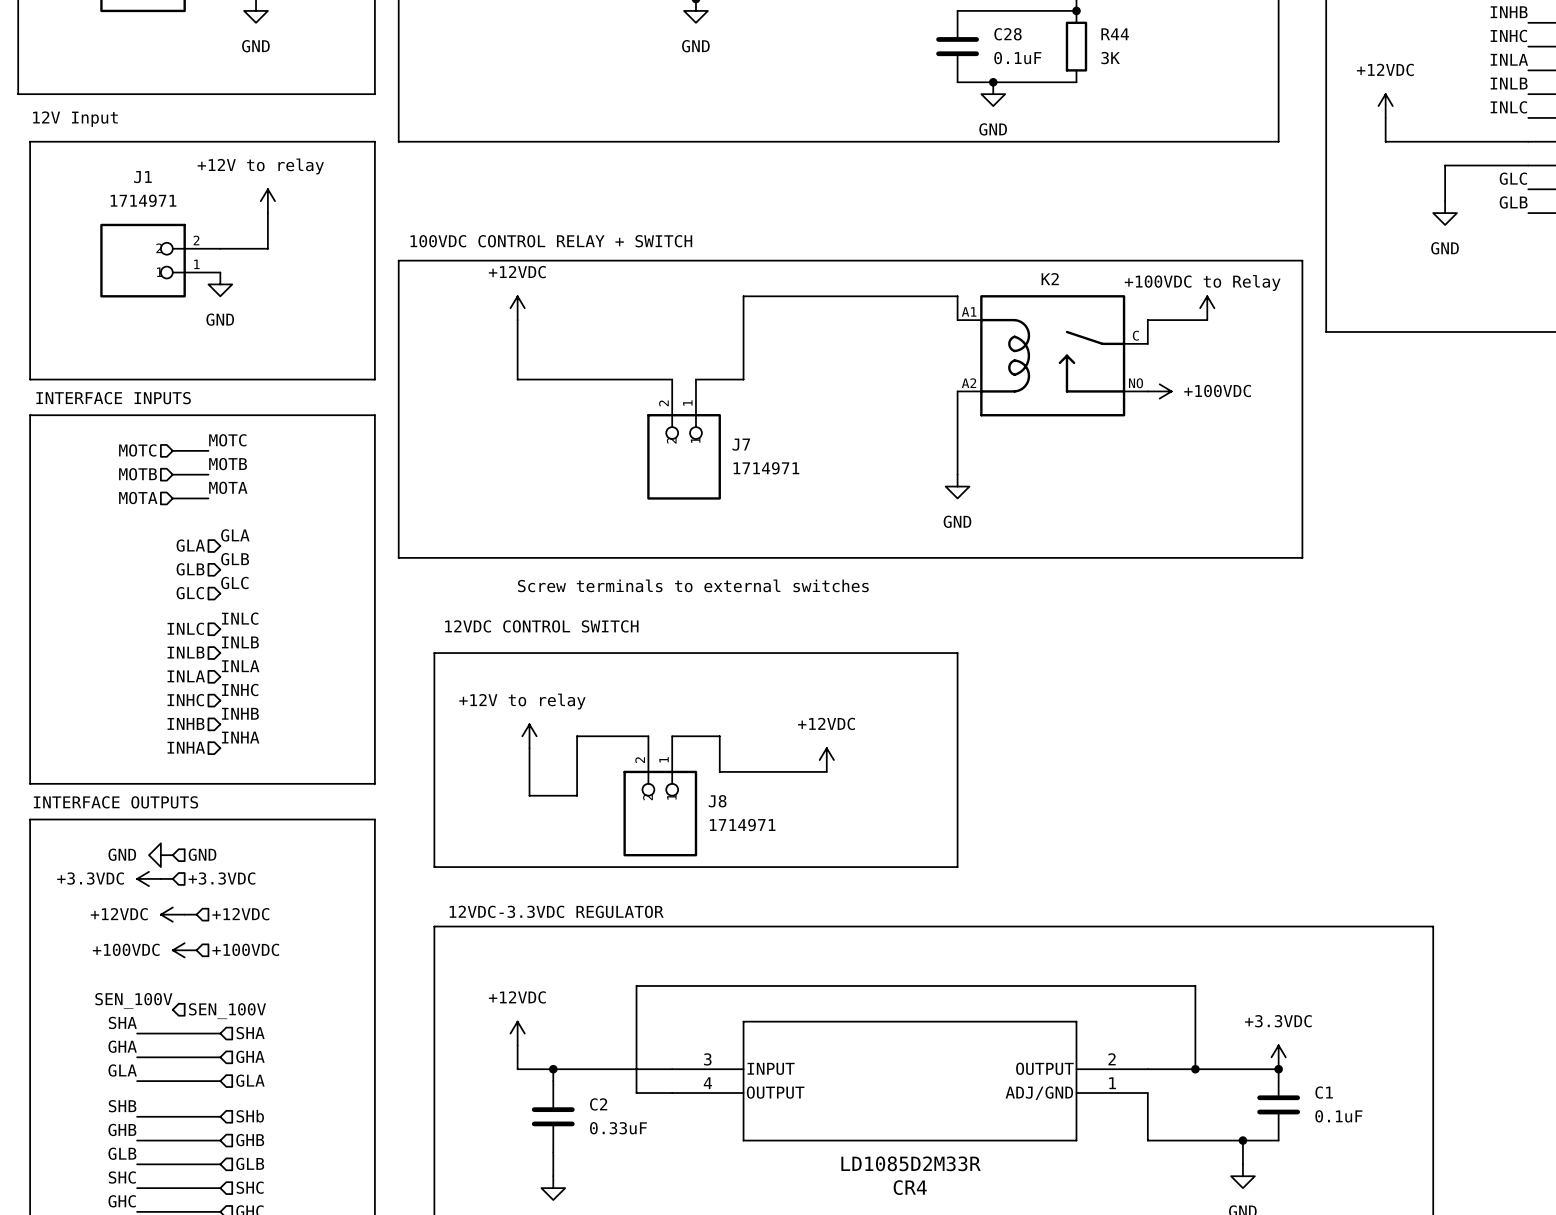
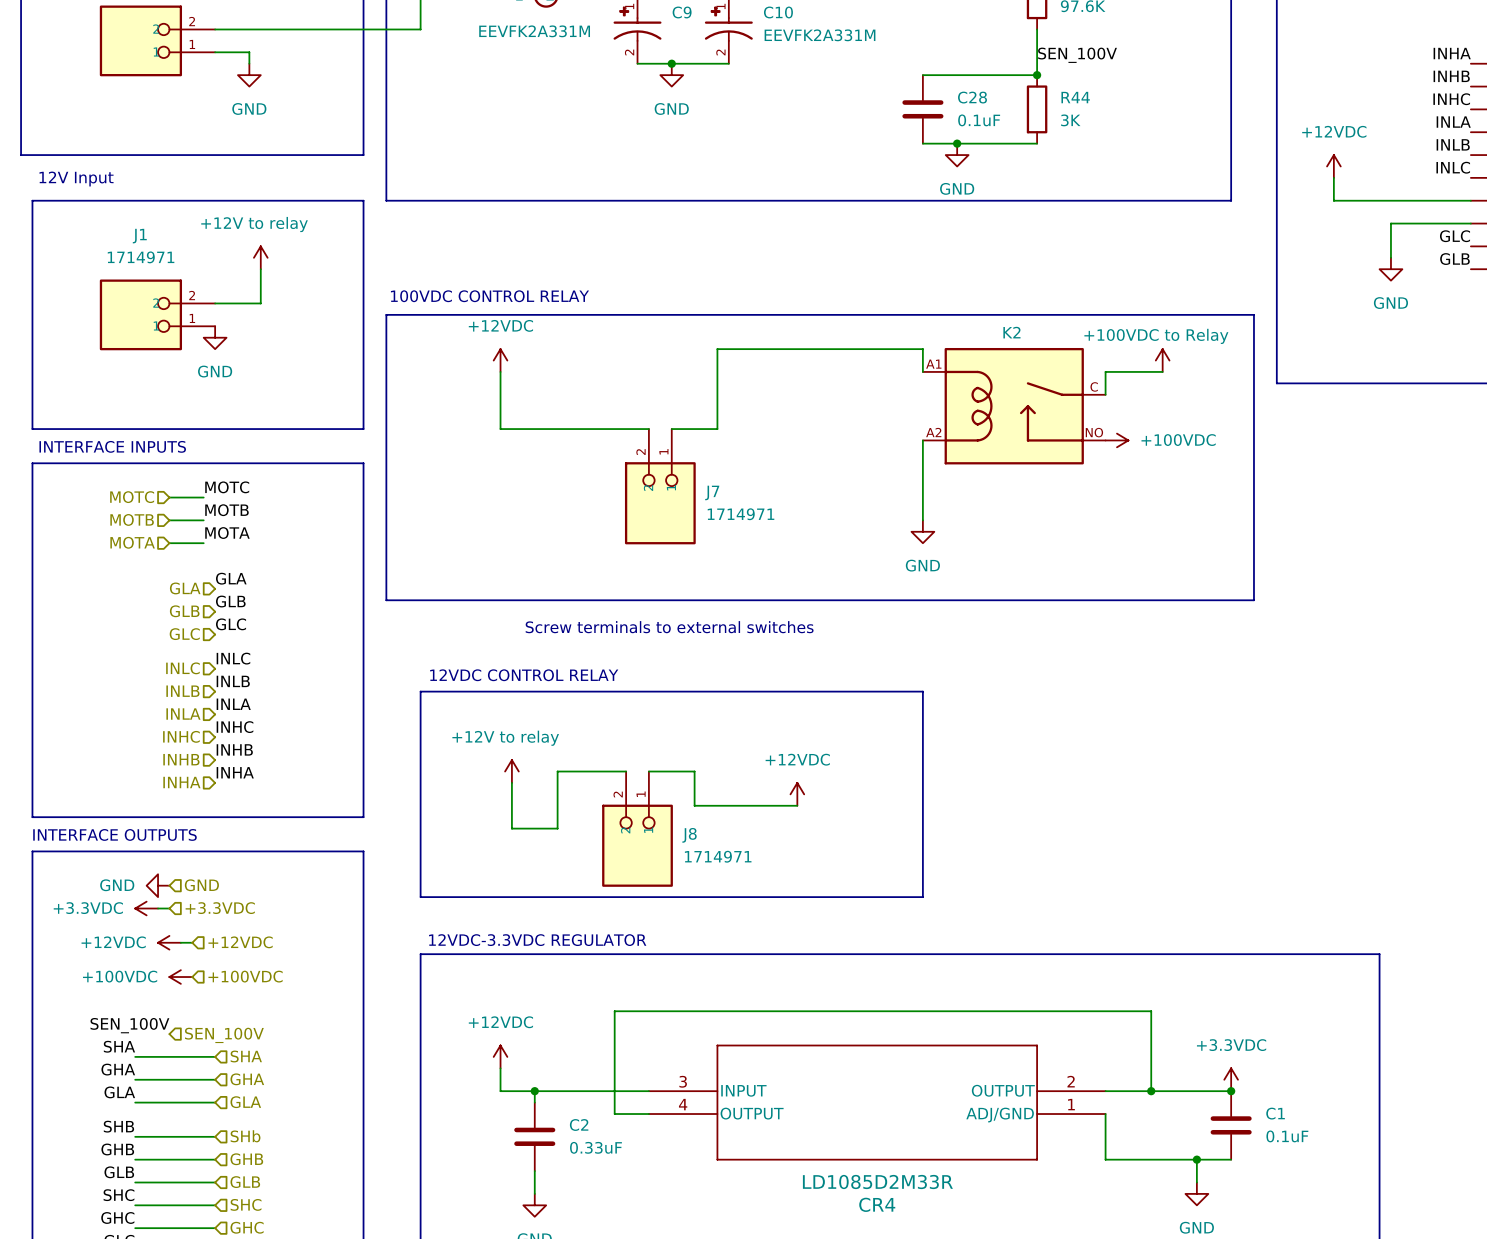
text: 100VDC CONTROL RELAY + SWITCH (551, 241) -> 100VDC CONTROL RELAY (489, 296)
text: 12VDC CONTROL SWITCH (541, 626) -> 12VDC CONTROL RELAY (524, 675)

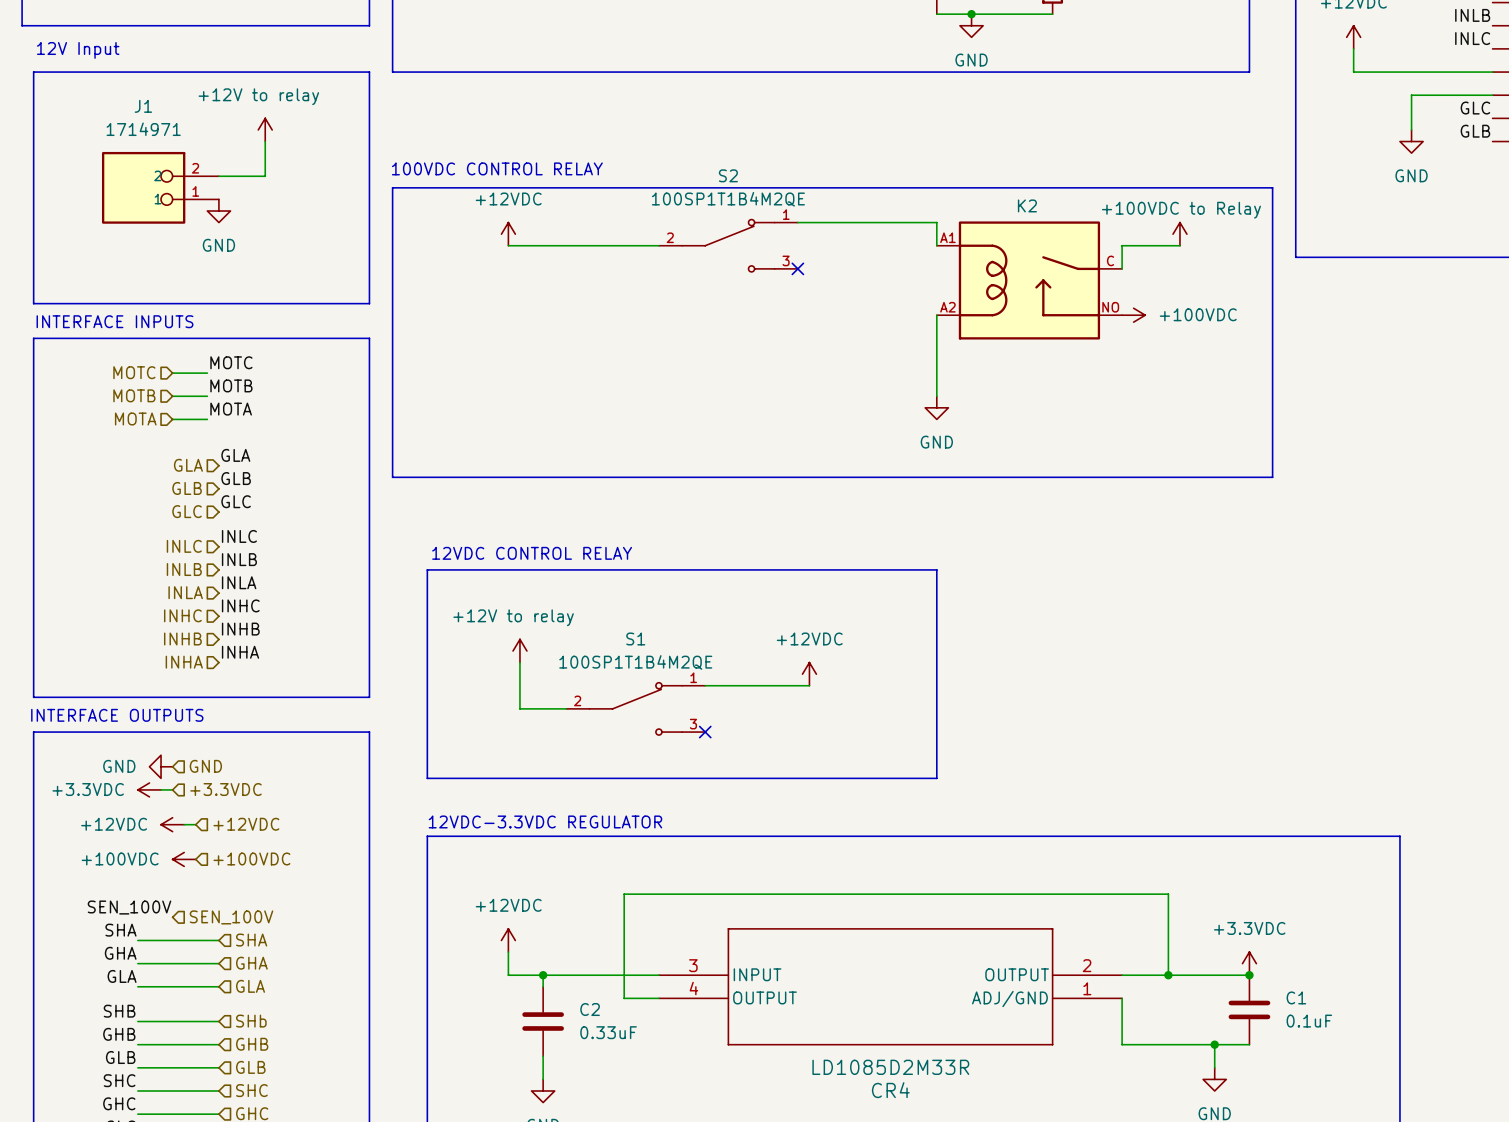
wire: (785, 349) (717, 349) (717, 429) (671, 429) -> none
wire: (500, 371) (500, 429) (648, 429) -> (508, 245) (658, 245)
S2: none -> 100SP1T1B4M2QE (728, 245)
no-connect mark: none -> (797, 268)
J7: 1714971 (660, 486) -> none
text: Screw terminals to external switches (669, 627) -> none
wire: (626, 771) (557, 771) (557, 828) -> none
wire: (648, 771) (694, 771) (694, 805) -> none
S1: none -> 100SP1T1B4M2QE (635, 708)
J8: 1714971 (637, 829) -> none
no-connect mark: none -> (705, 732)

